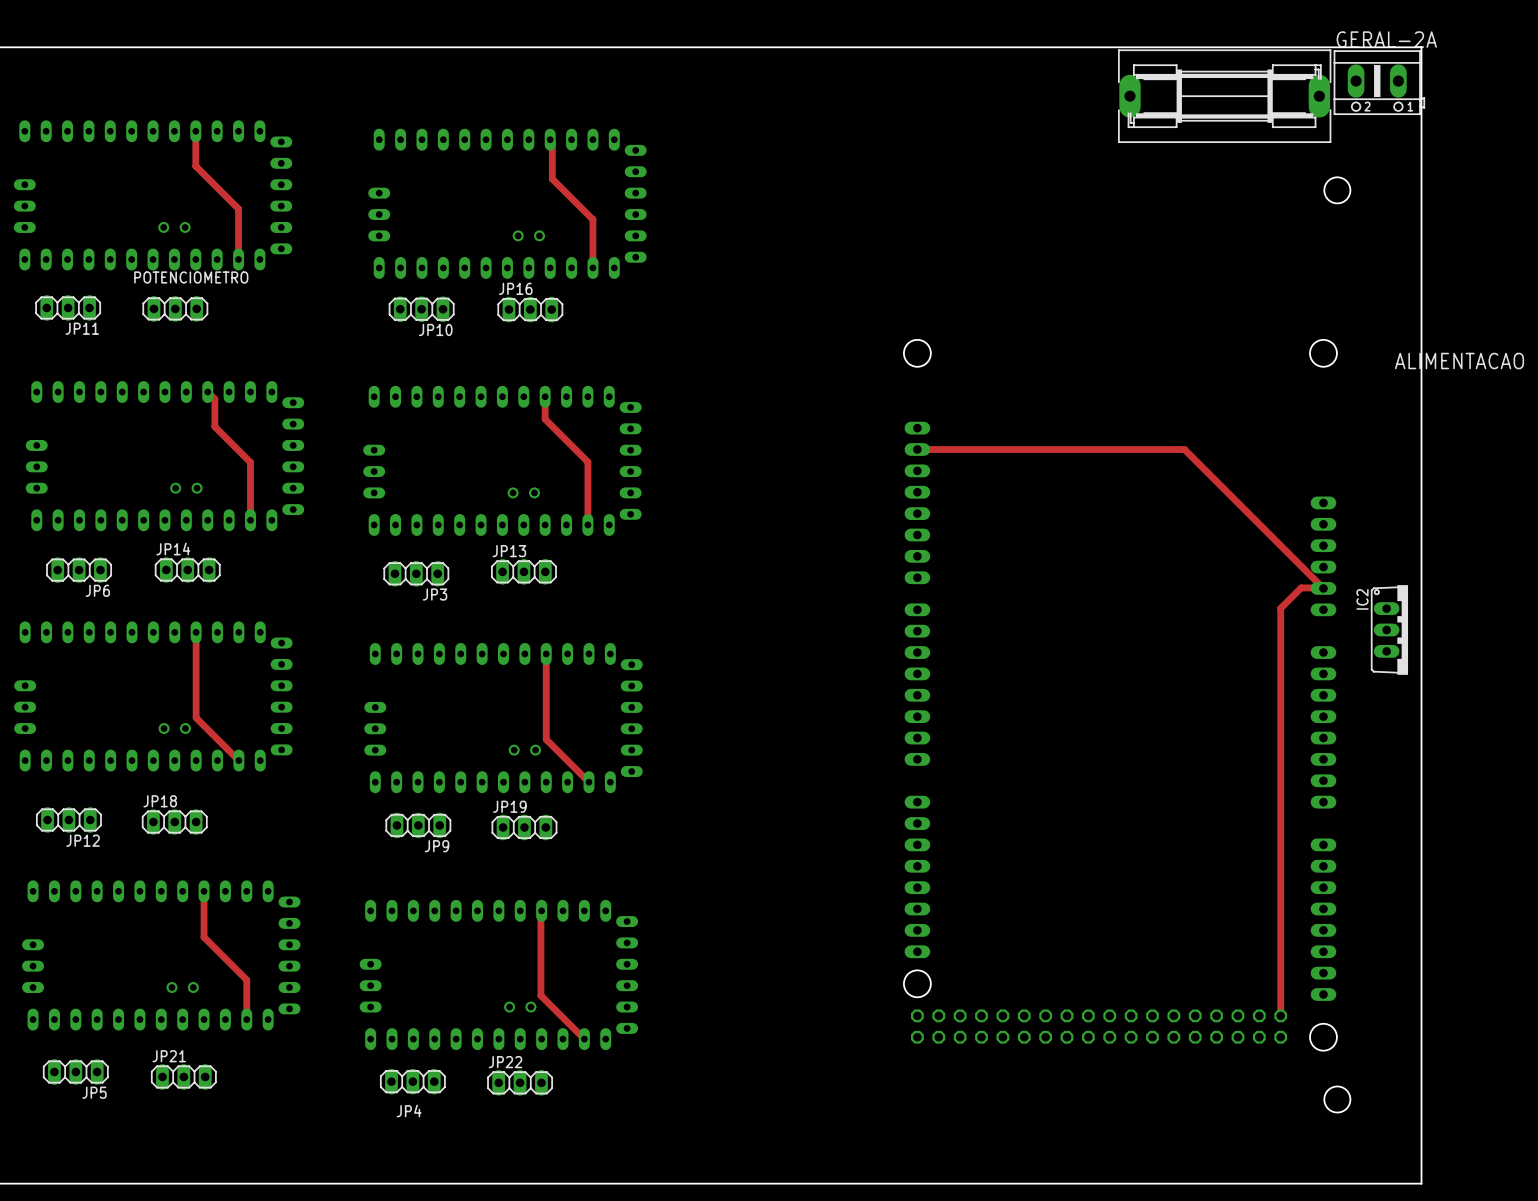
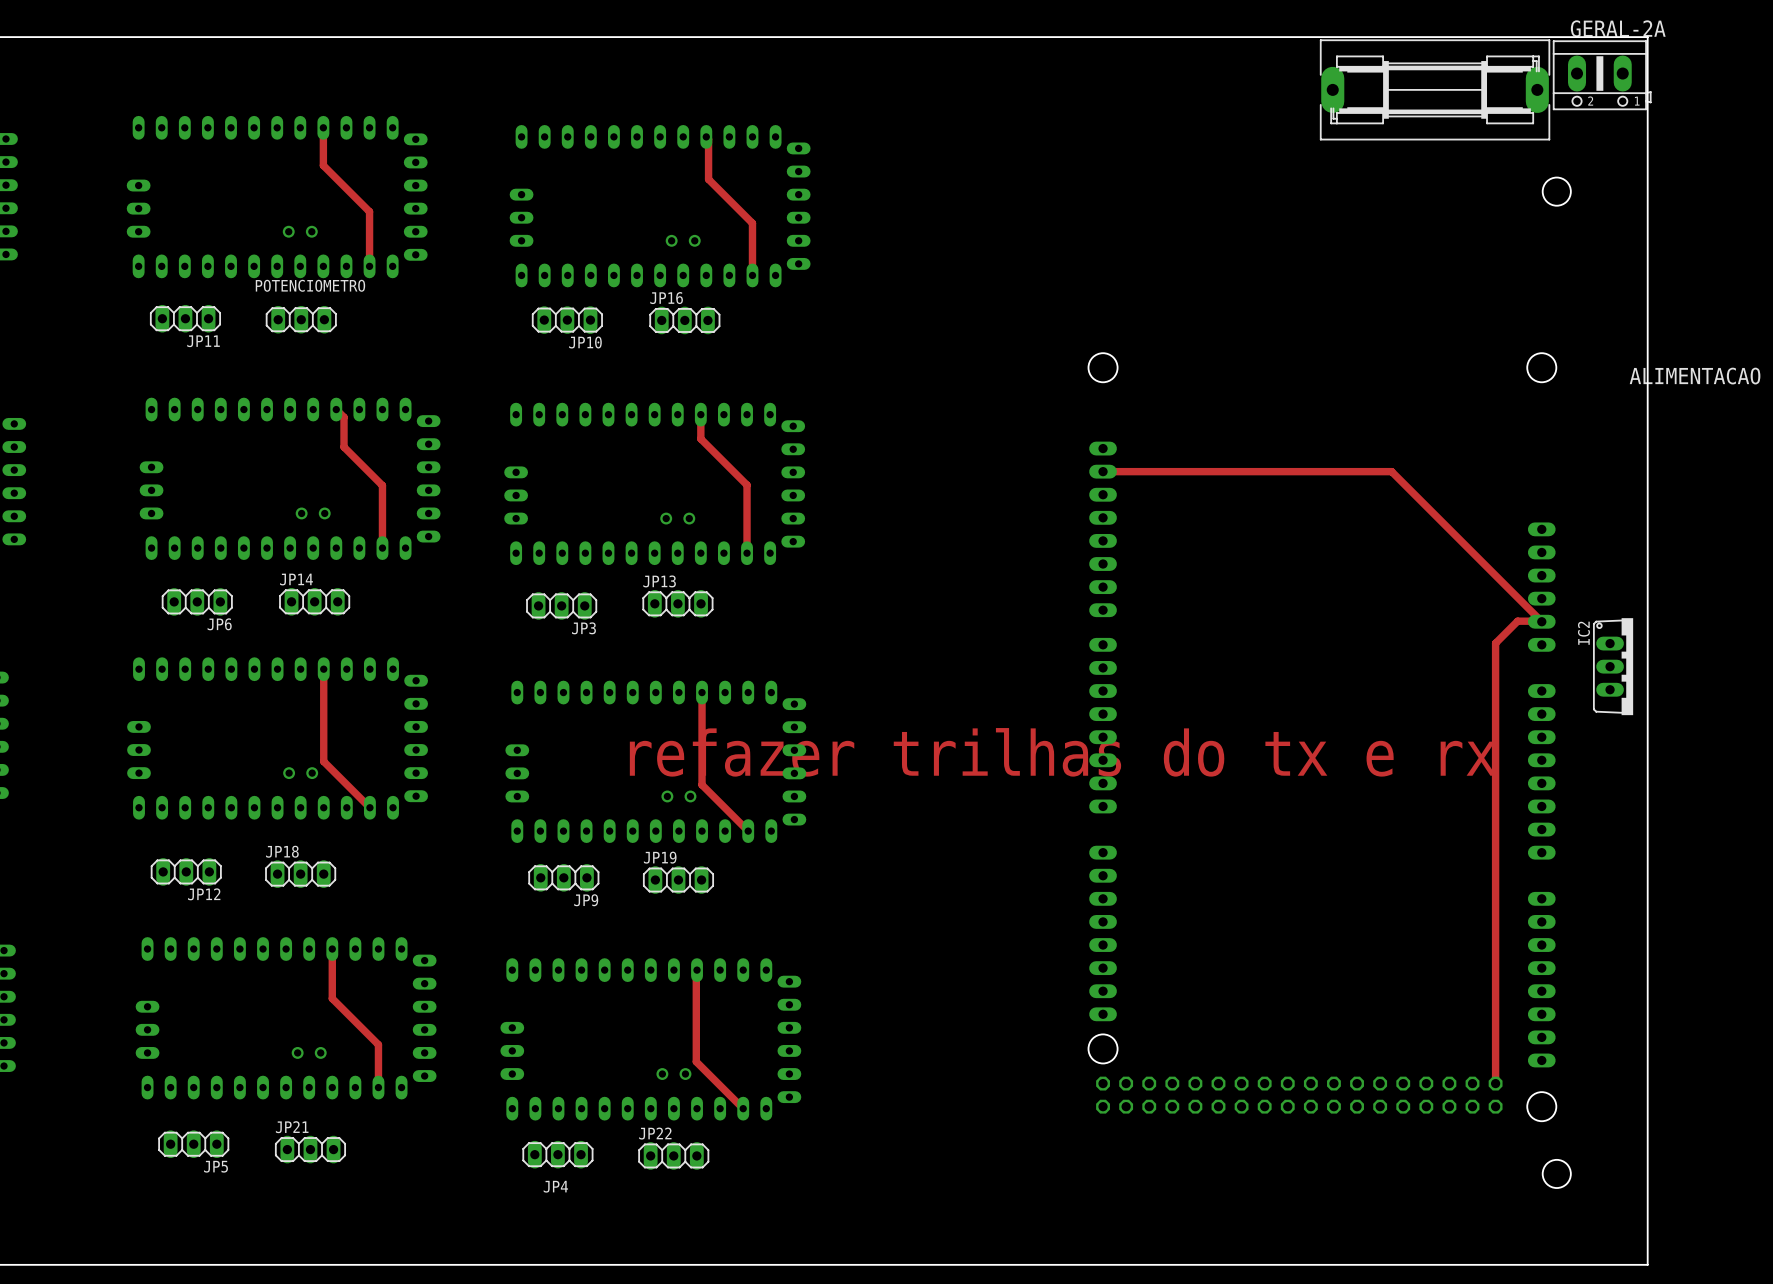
text: none -> refazer trilhas do tx e rx (1063, 752)

